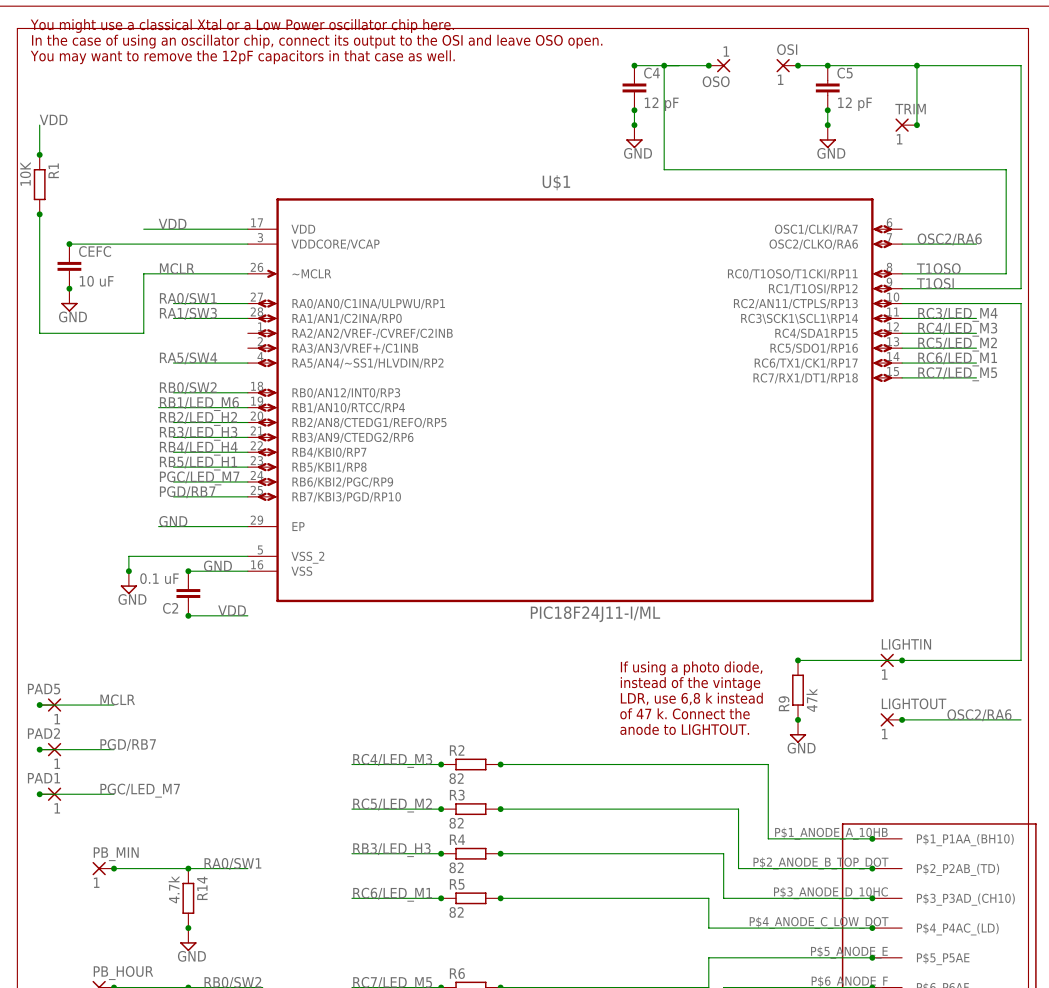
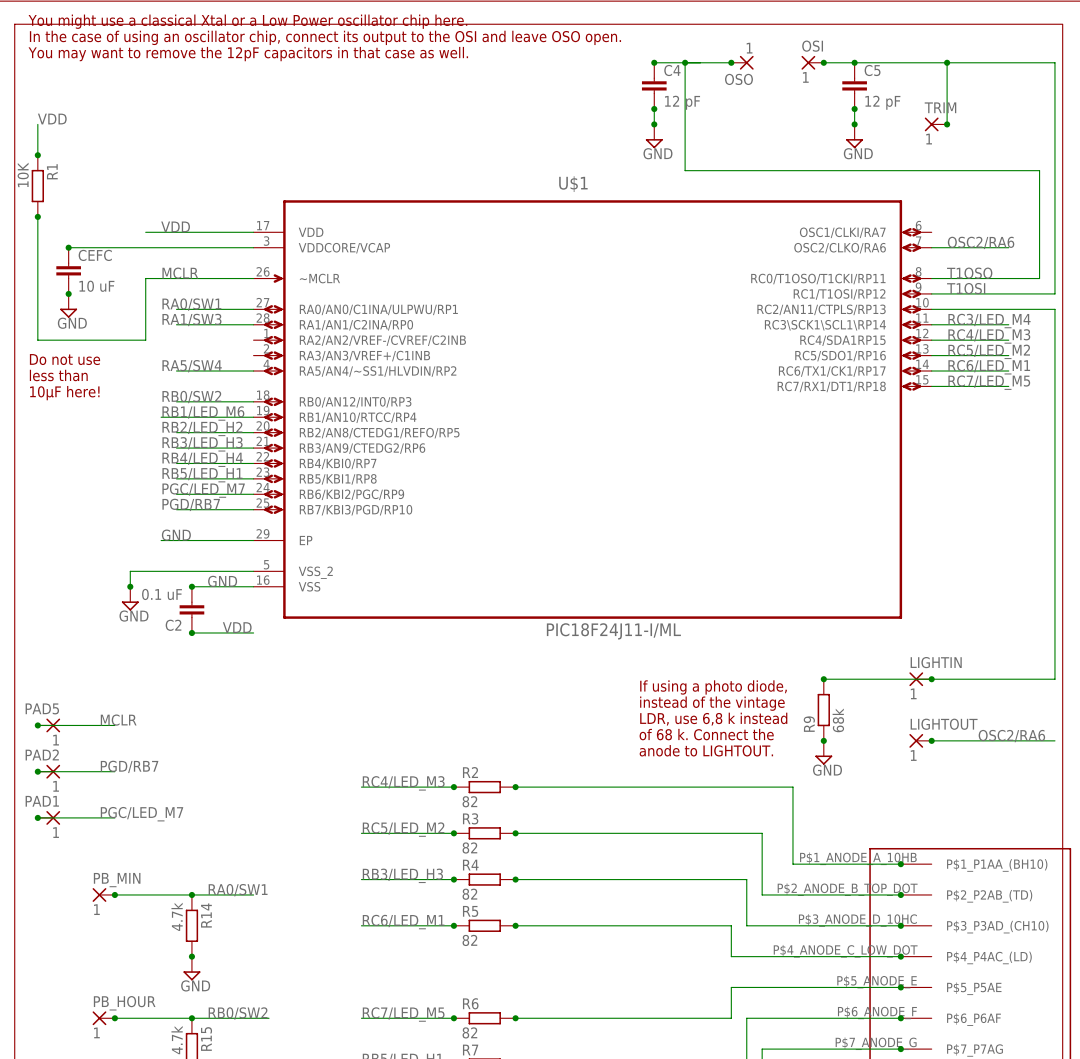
text: none -> Do not use (65, 359)
text: none -> less than (58, 375)
text: none -> 10µF here! (64, 393)
R9 value: 47k (811, 700) -> 68k (838, 720)
text: of 47 k. Connect the (685, 713) -> of 68 k. Connect the (706, 734)

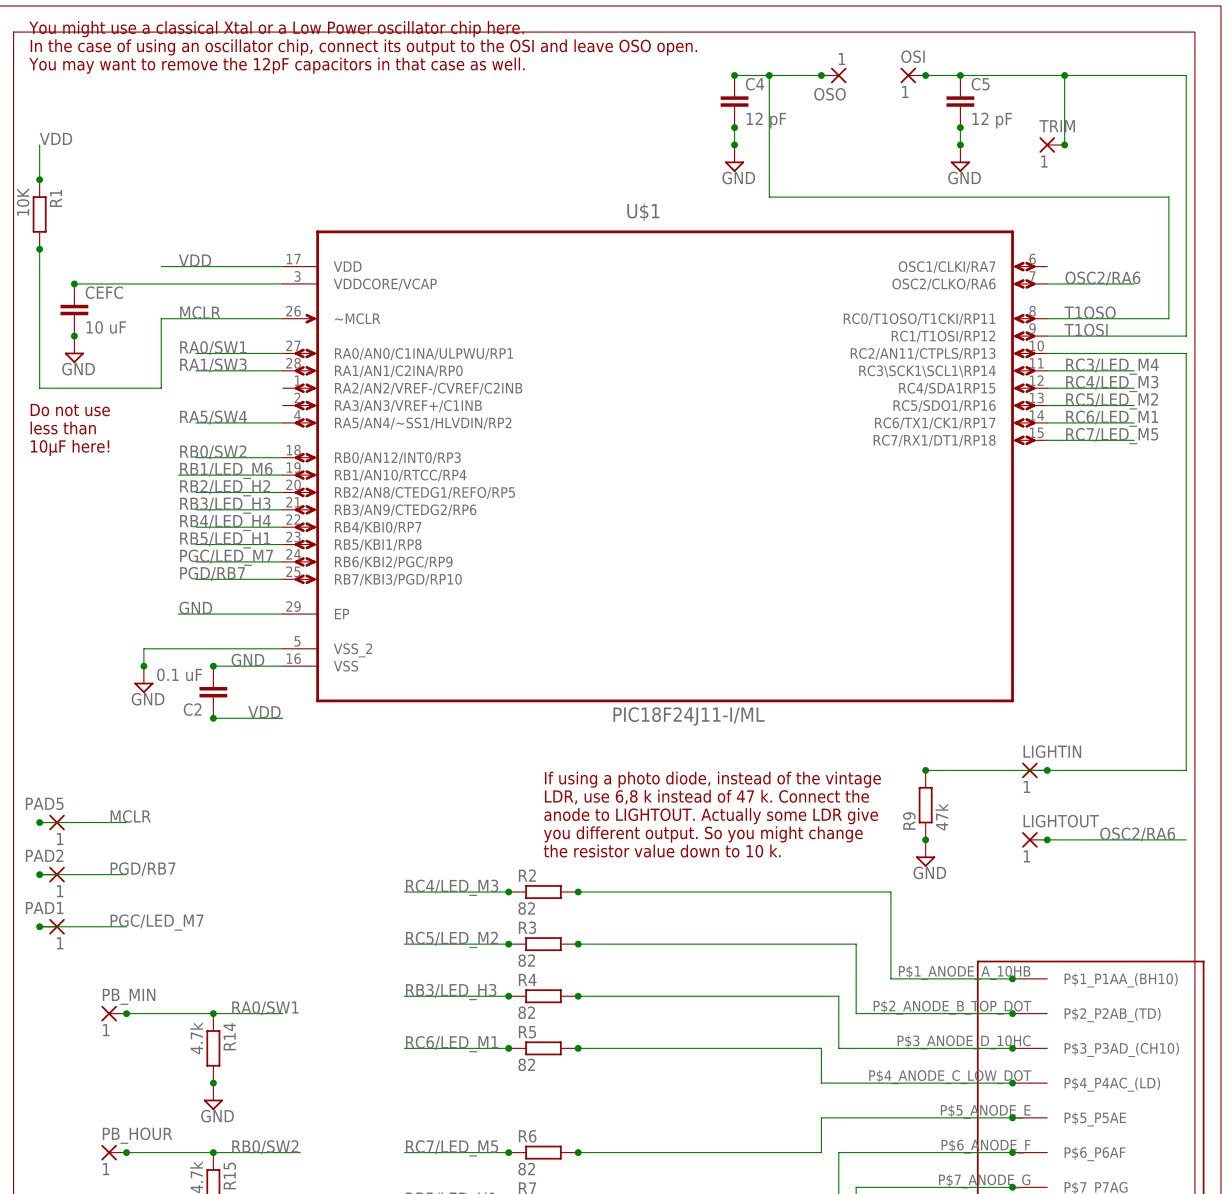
text: none -> If using a photo diode, instead of the vintage (712, 779)
text: If using a photo diode, (713, 687) -> none
text: none -> LDR, use 6,8 k instead of 47 k. Connect the (706, 797)
text: instead of the vintage (712, 703) -> none
text: none -> anode to LIGHTOUT. Actually some LDR give (711, 816)
text: LDR, use 6,8 k instead (713, 719) -> none
R9 value: 68k (838, 720) -> 47k (941, 816)
text: of 68 k. Connect the (706, 734) -> none
text: none -> you different output. So you might change (703, 834)
text: none -> the resistor value down to 10 k. (662, 851)
text: anode to LIGHTOUT. (706, 750) -> none

